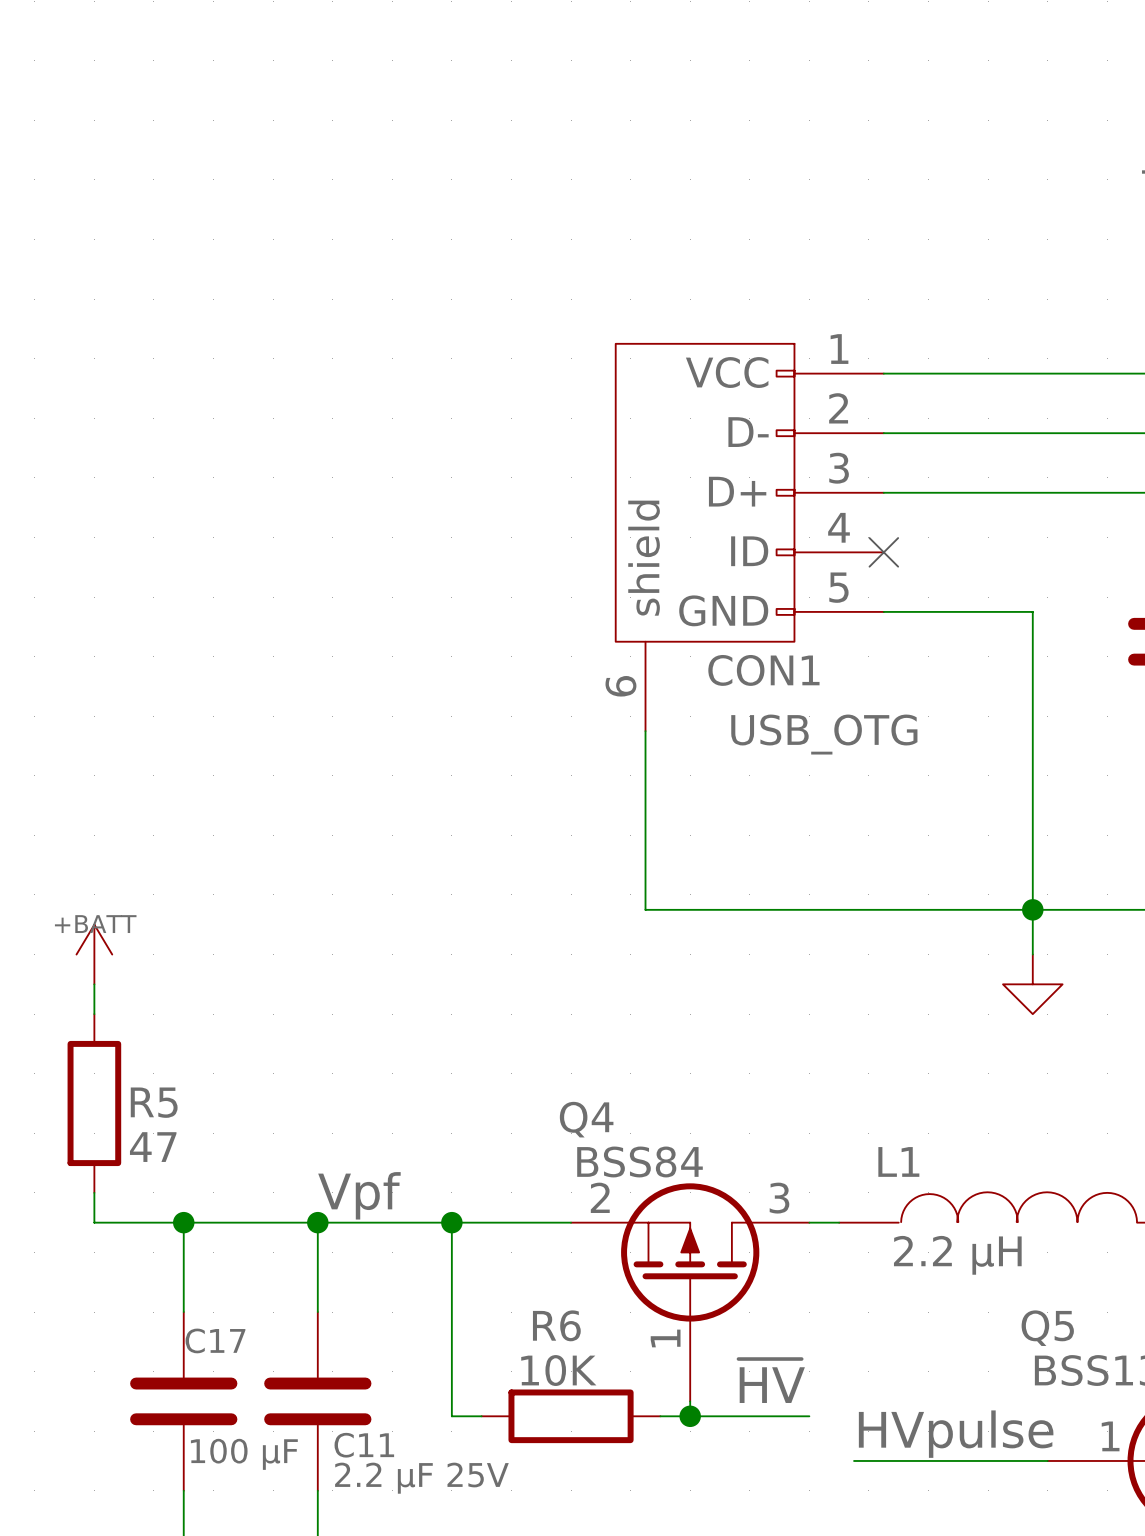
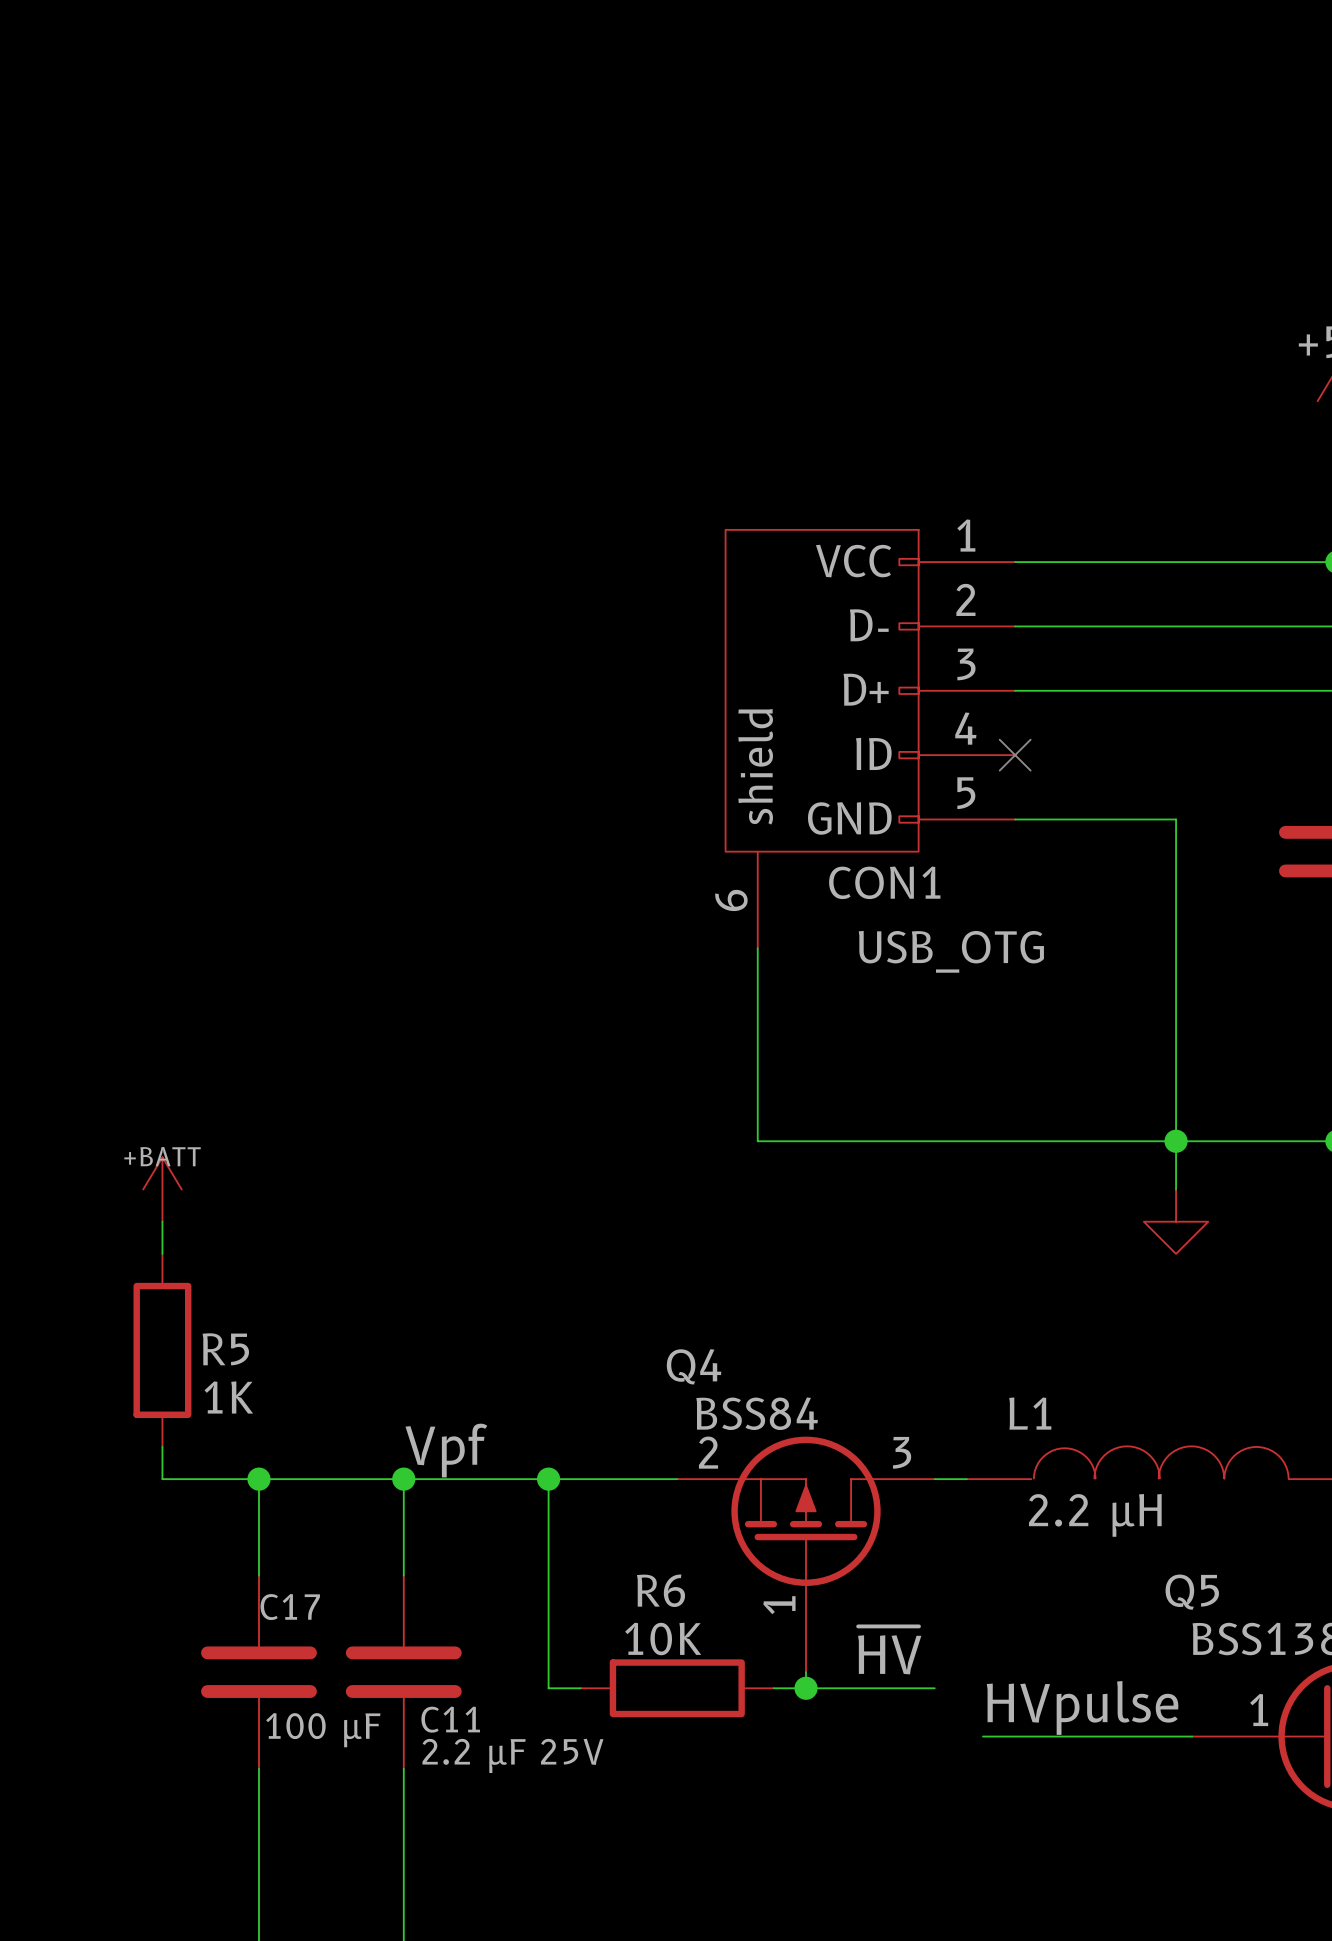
R5 value: 47 (153, 1147) -> 1K (228, 1397)

